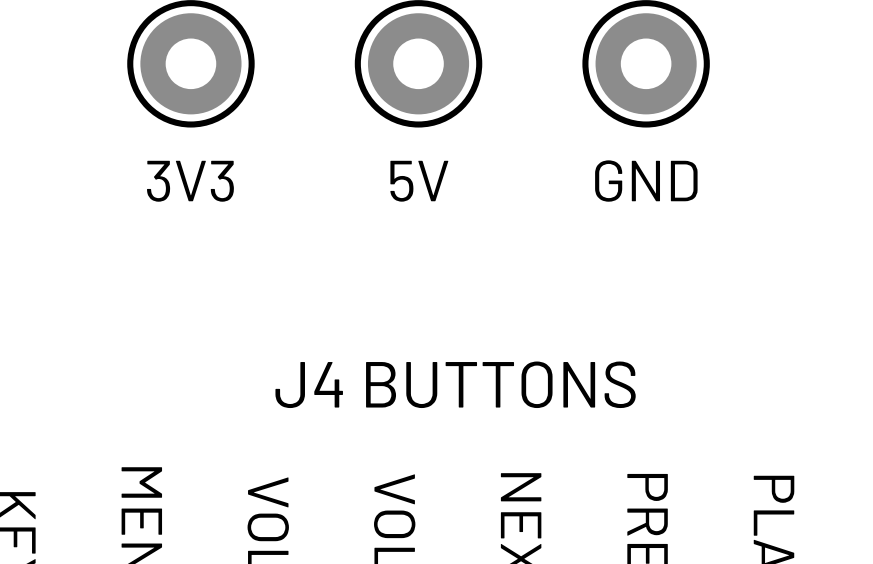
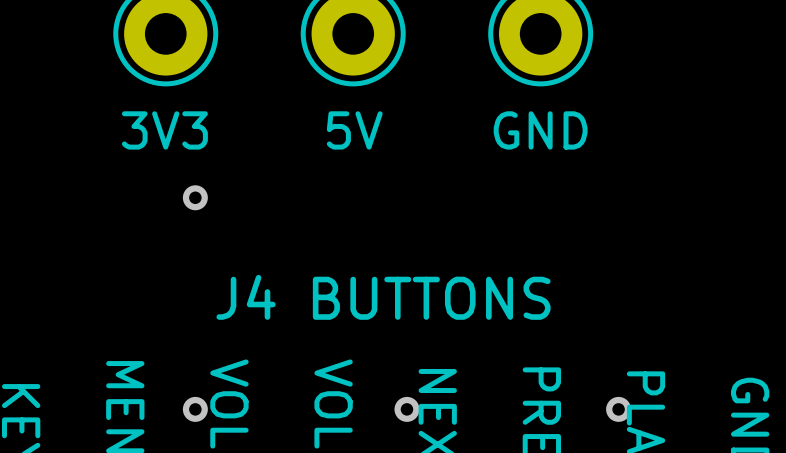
via: none -> (195, 197)
via: none -> (195, 409)
via: none -> (406, 409)
via: none -> (618, 409)

